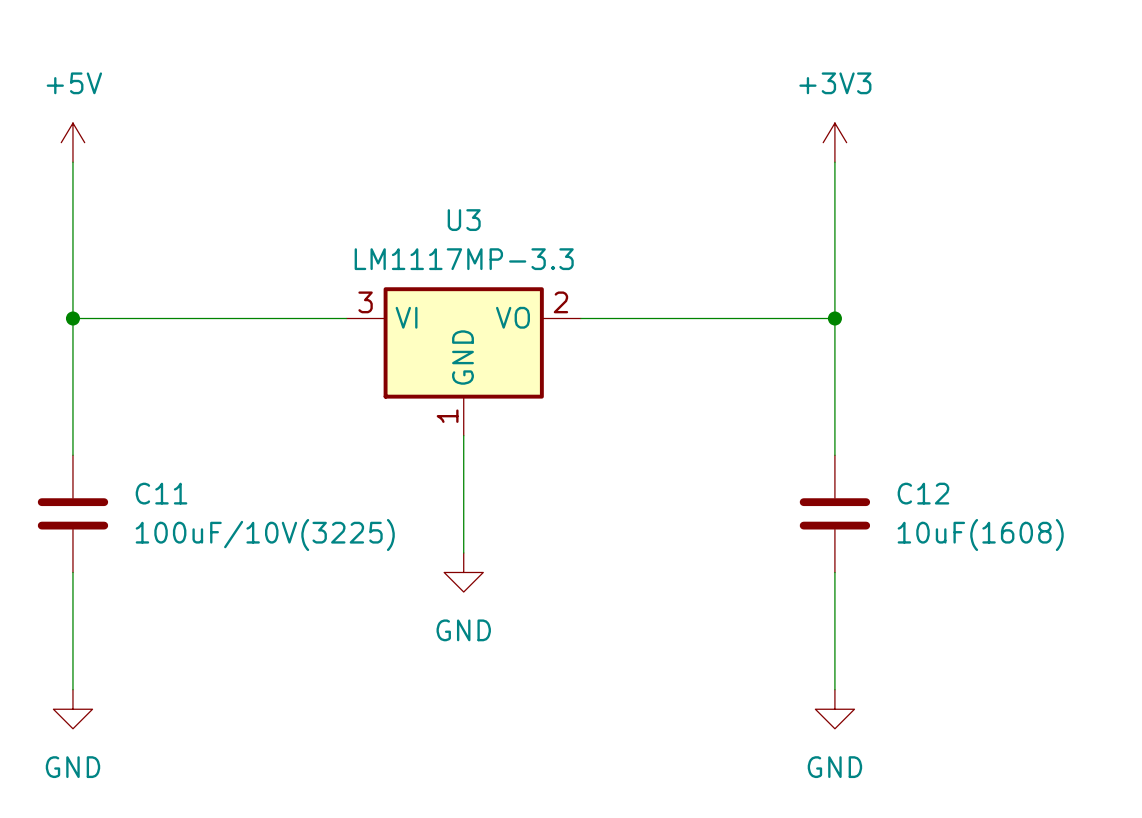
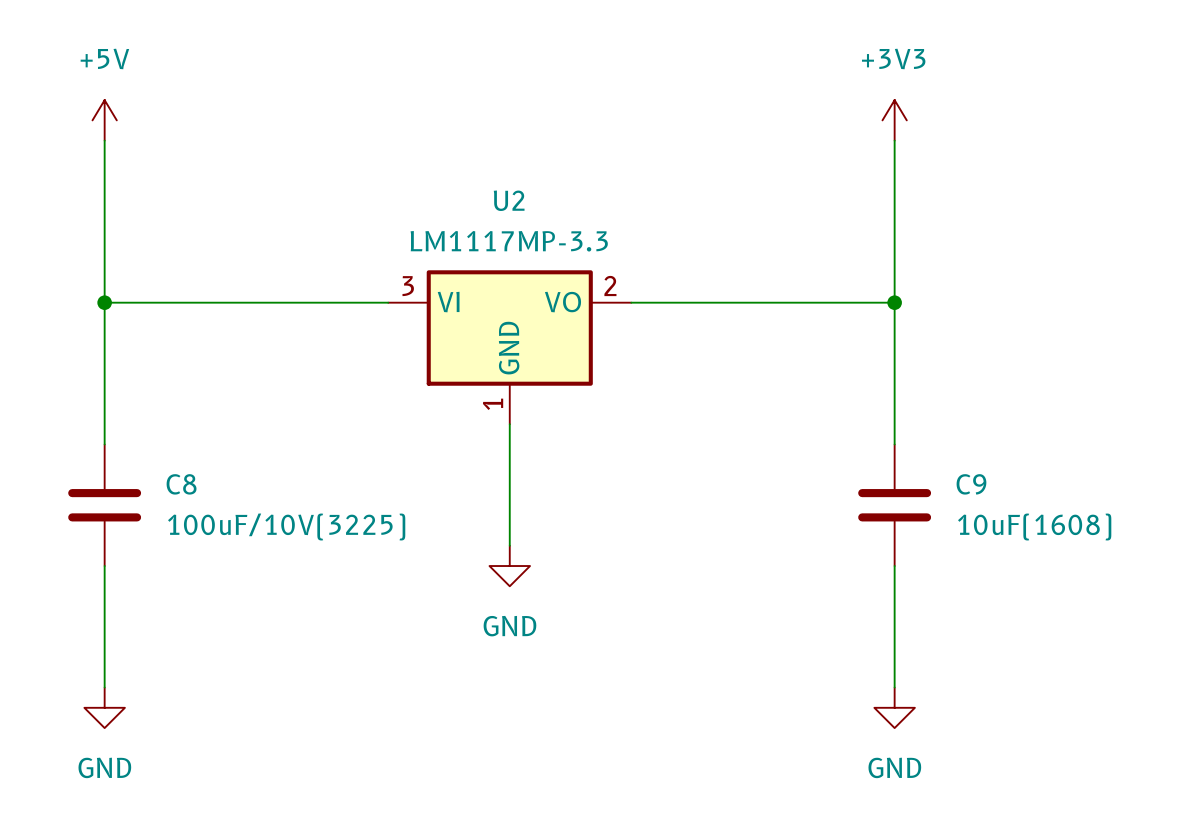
U3 name: U3 (464, 220) -> U2 (509, 200)
C11 name: C11 (161, 493) -> C8 (181, 484)
C12 name: C12 (923, 493) -> C9 (971, 484)

